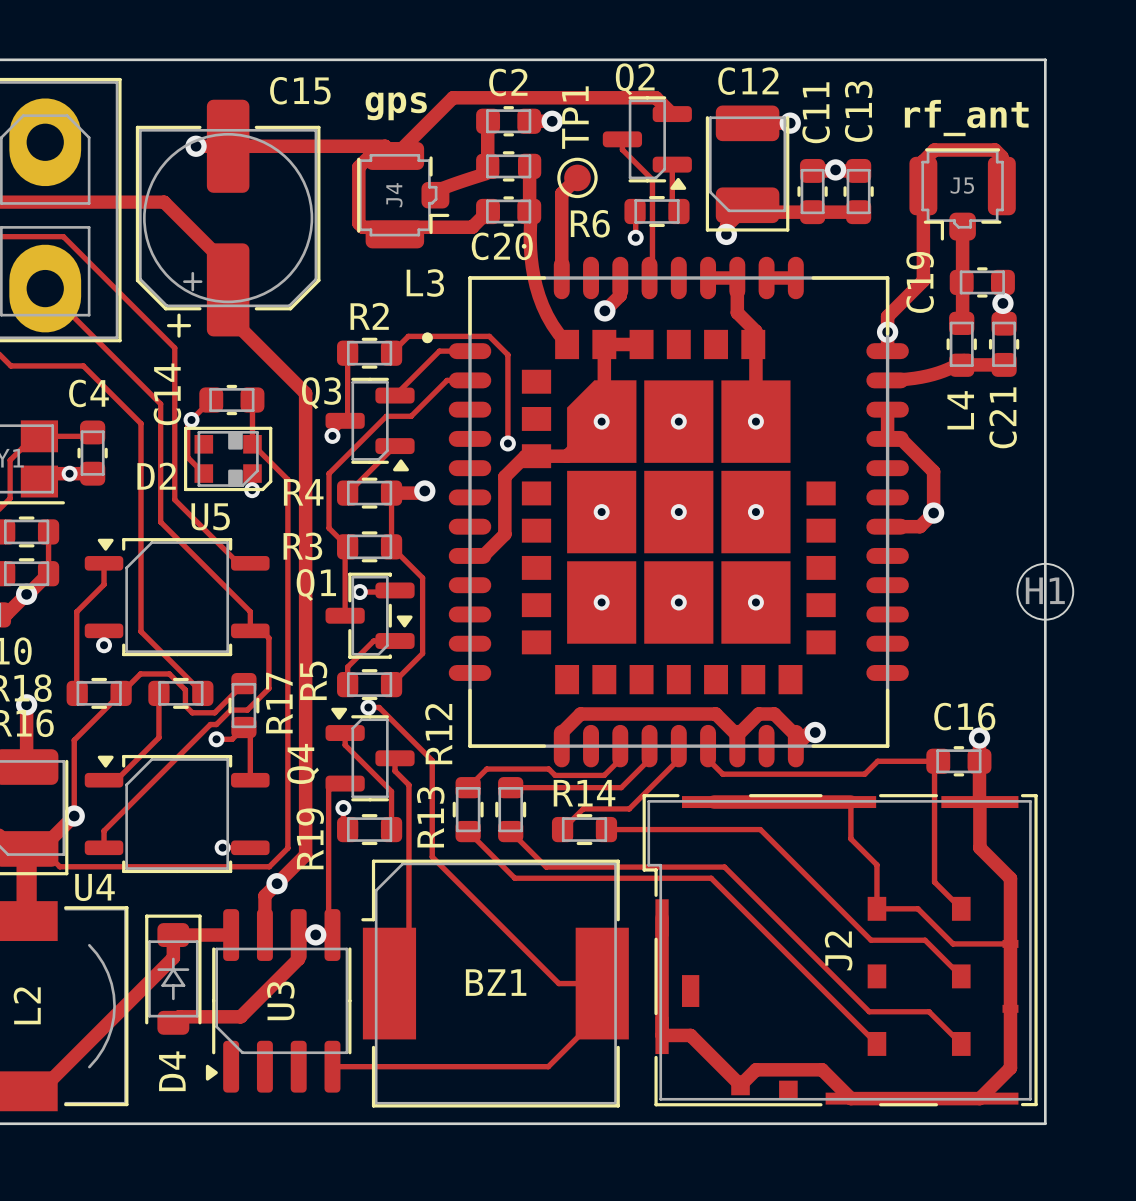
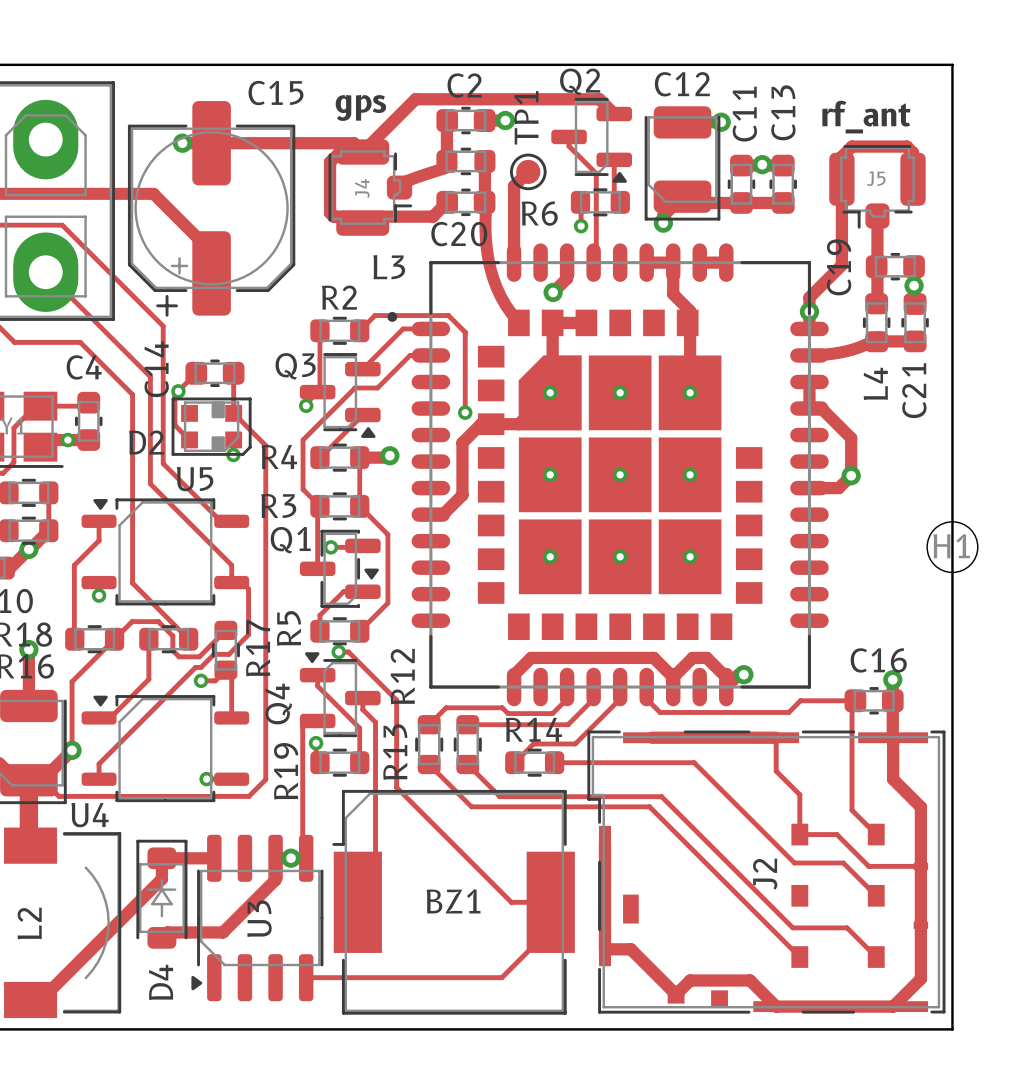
track: (228, 289) (228, 315) (305, 393) (305, 855) (264, 895) (264, 935) -> none
via: (277, 883) -> none

